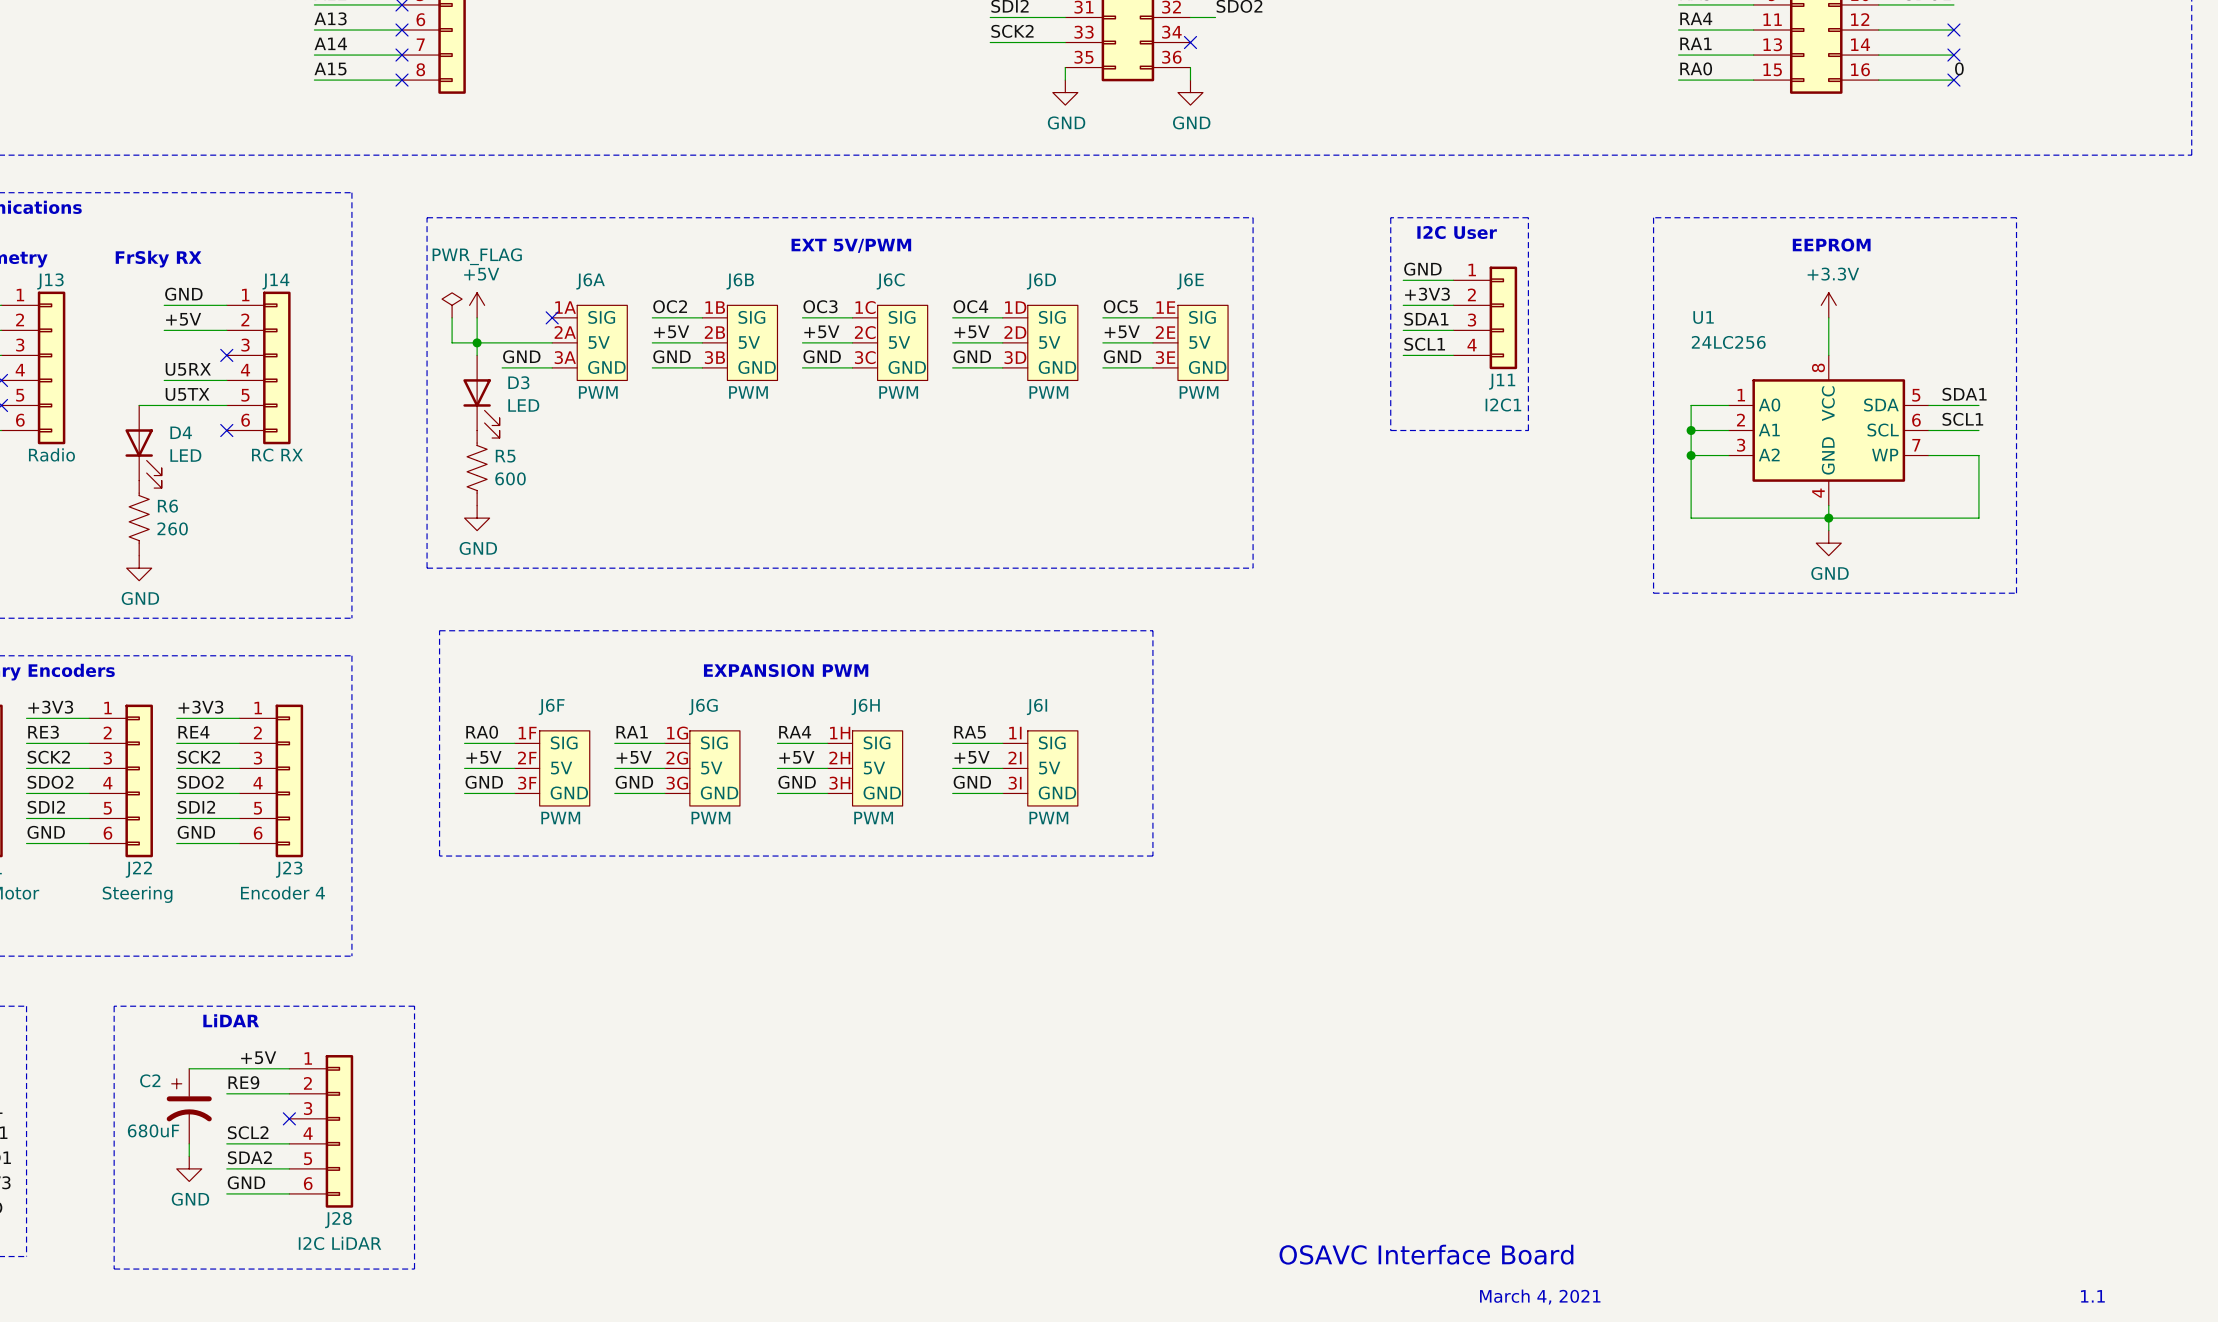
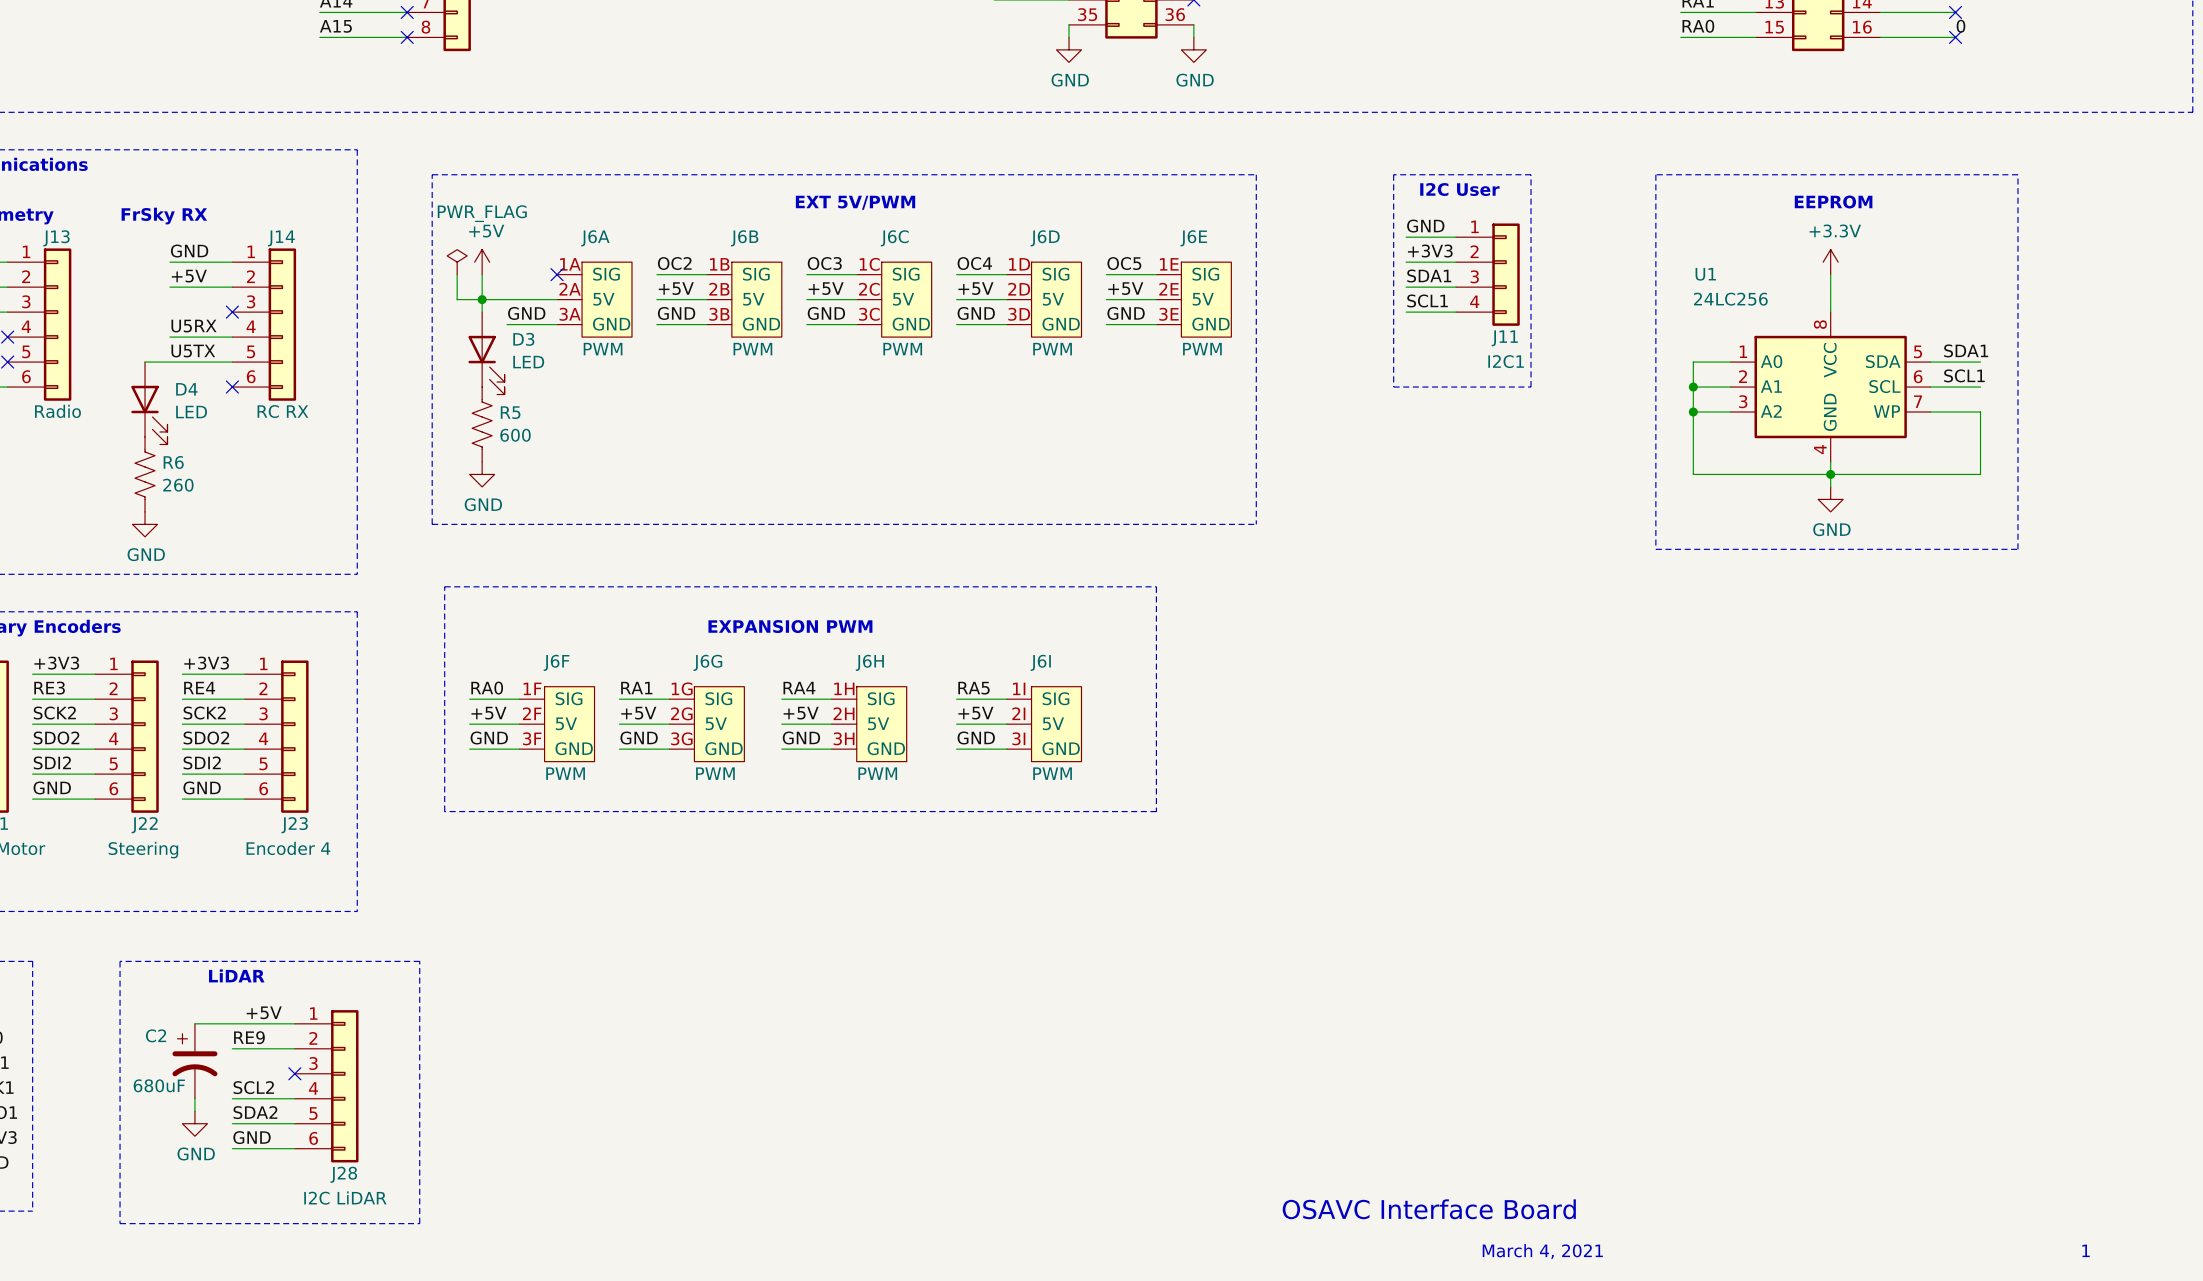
text: 1.1 (2092, 1296) -> 1 (2086, 1250)

